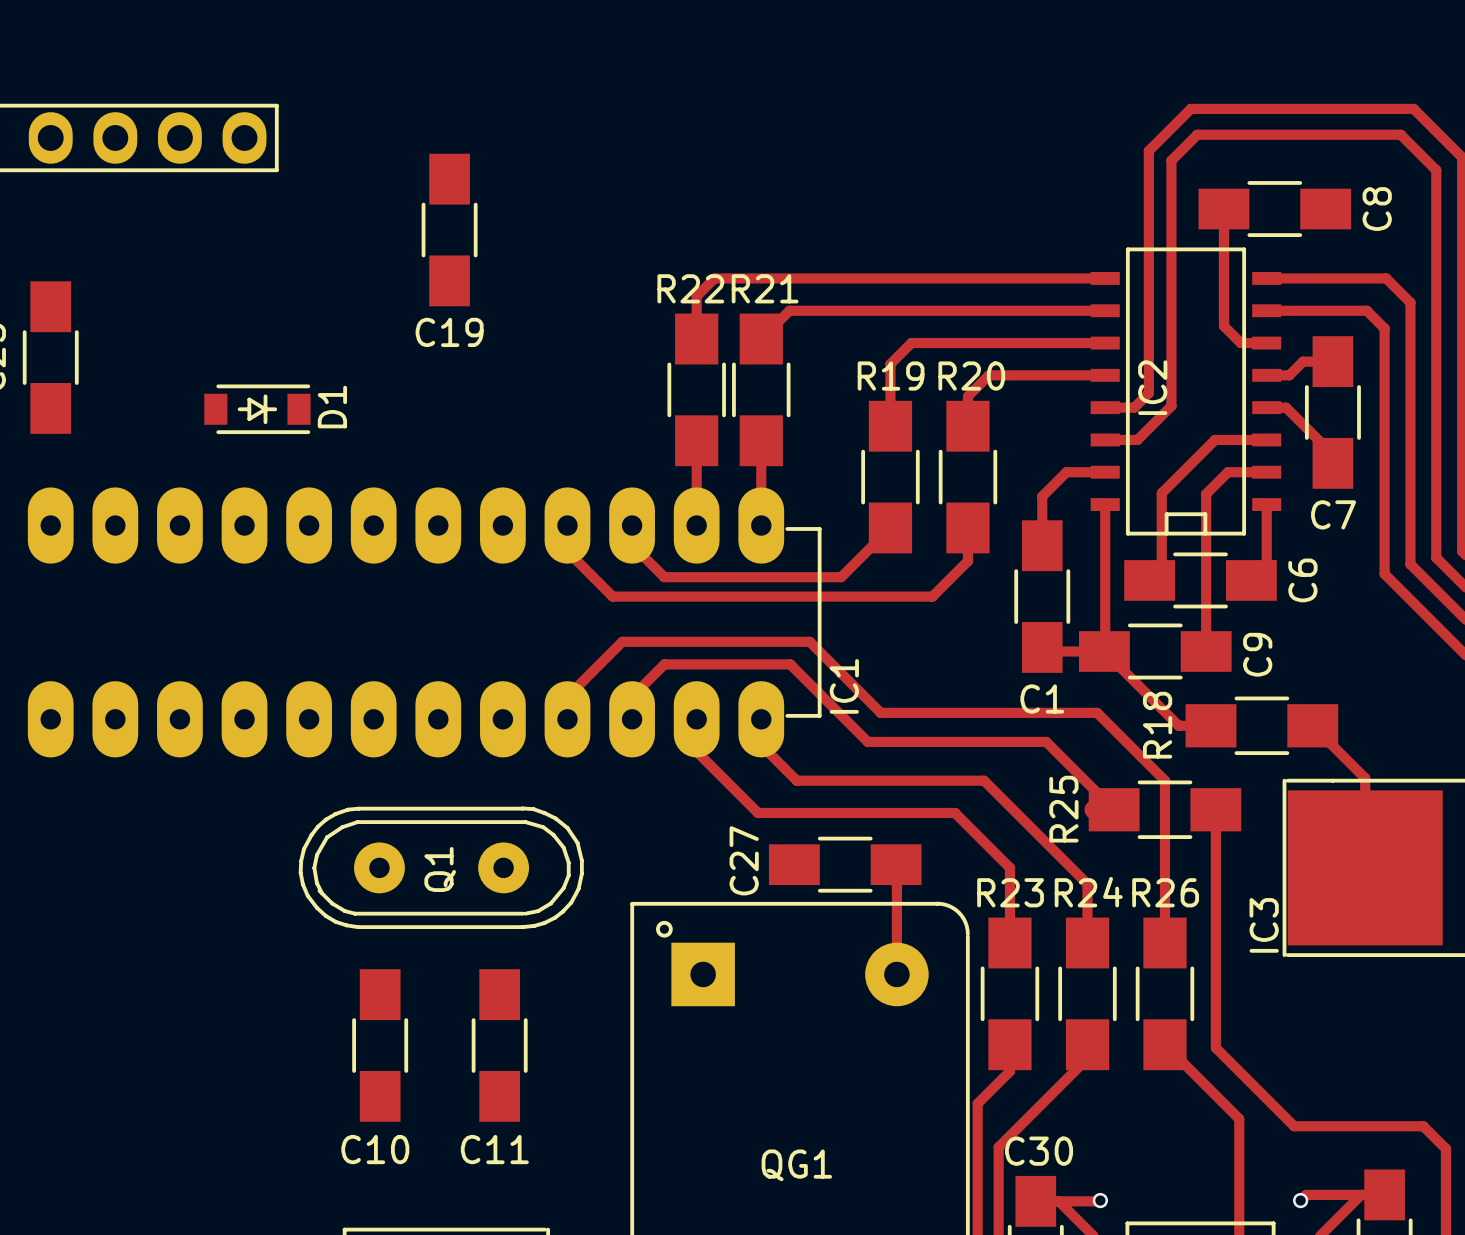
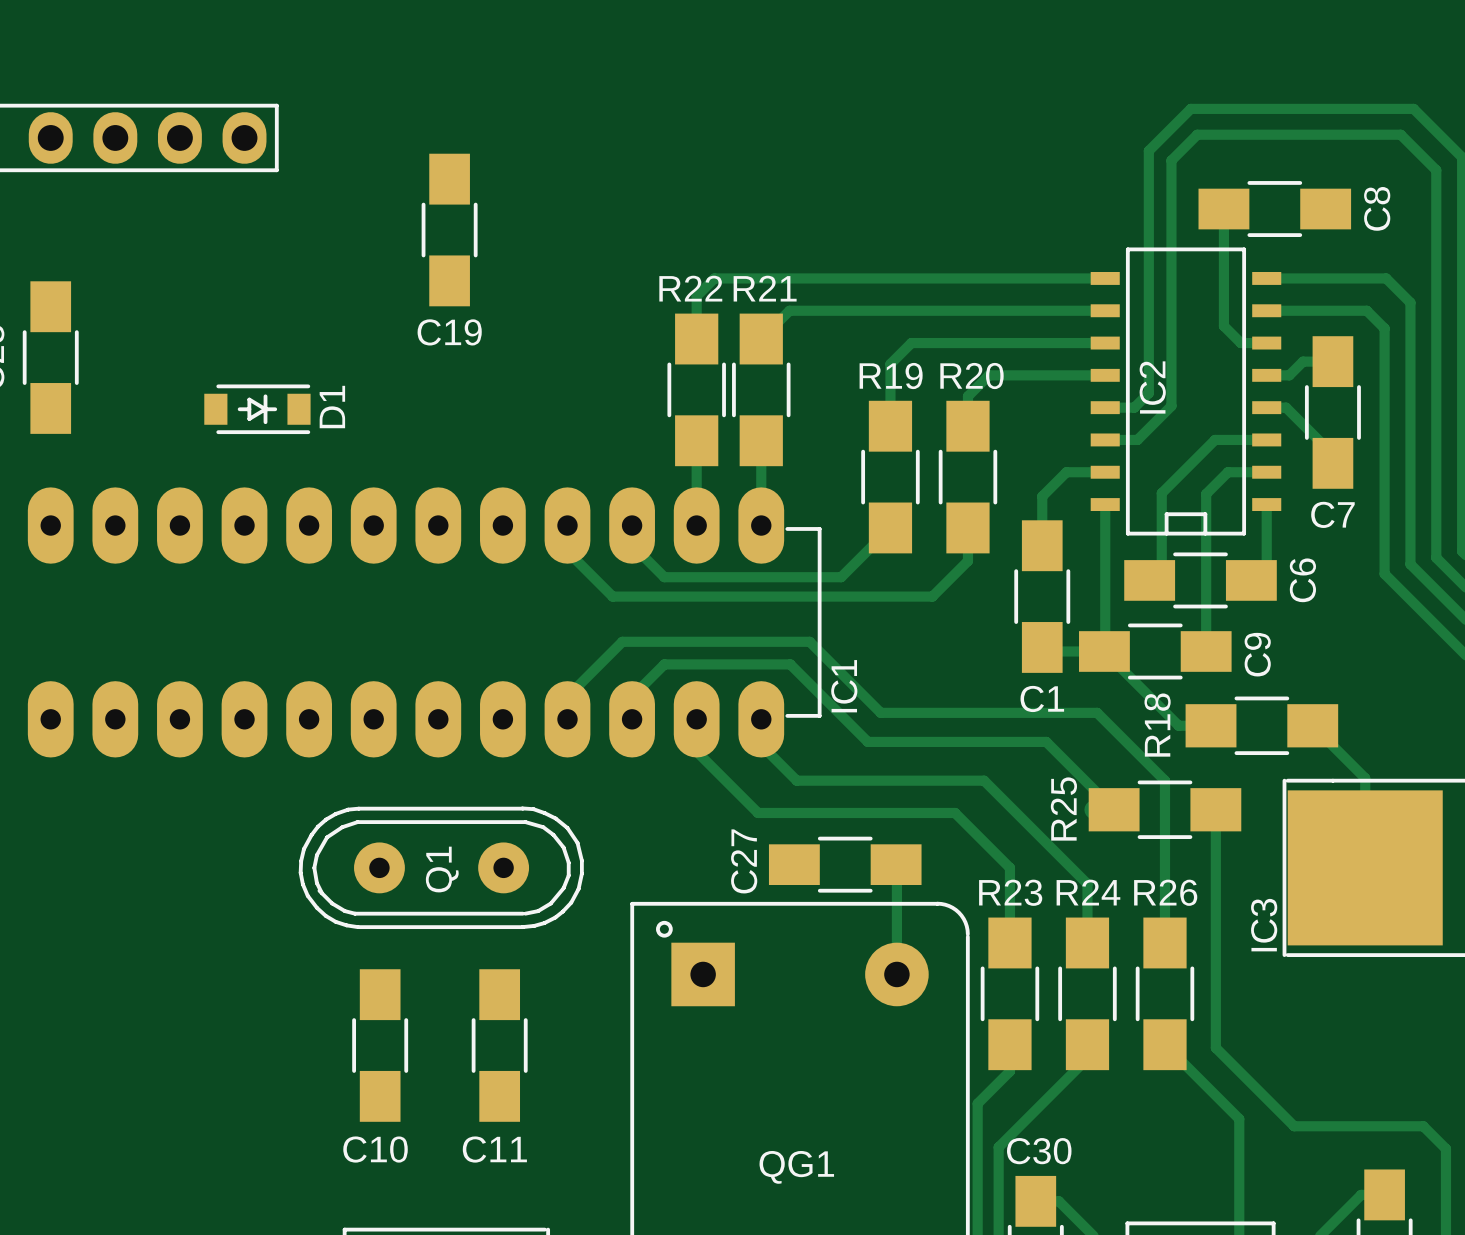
track: (1361, 1194) (1306, 1194) (1300, 1200) -> none
track: (1100, 1200) (1058, 1201) -> none
via: (1100, 1200) -> none
via: (1300, 1200) -> none

